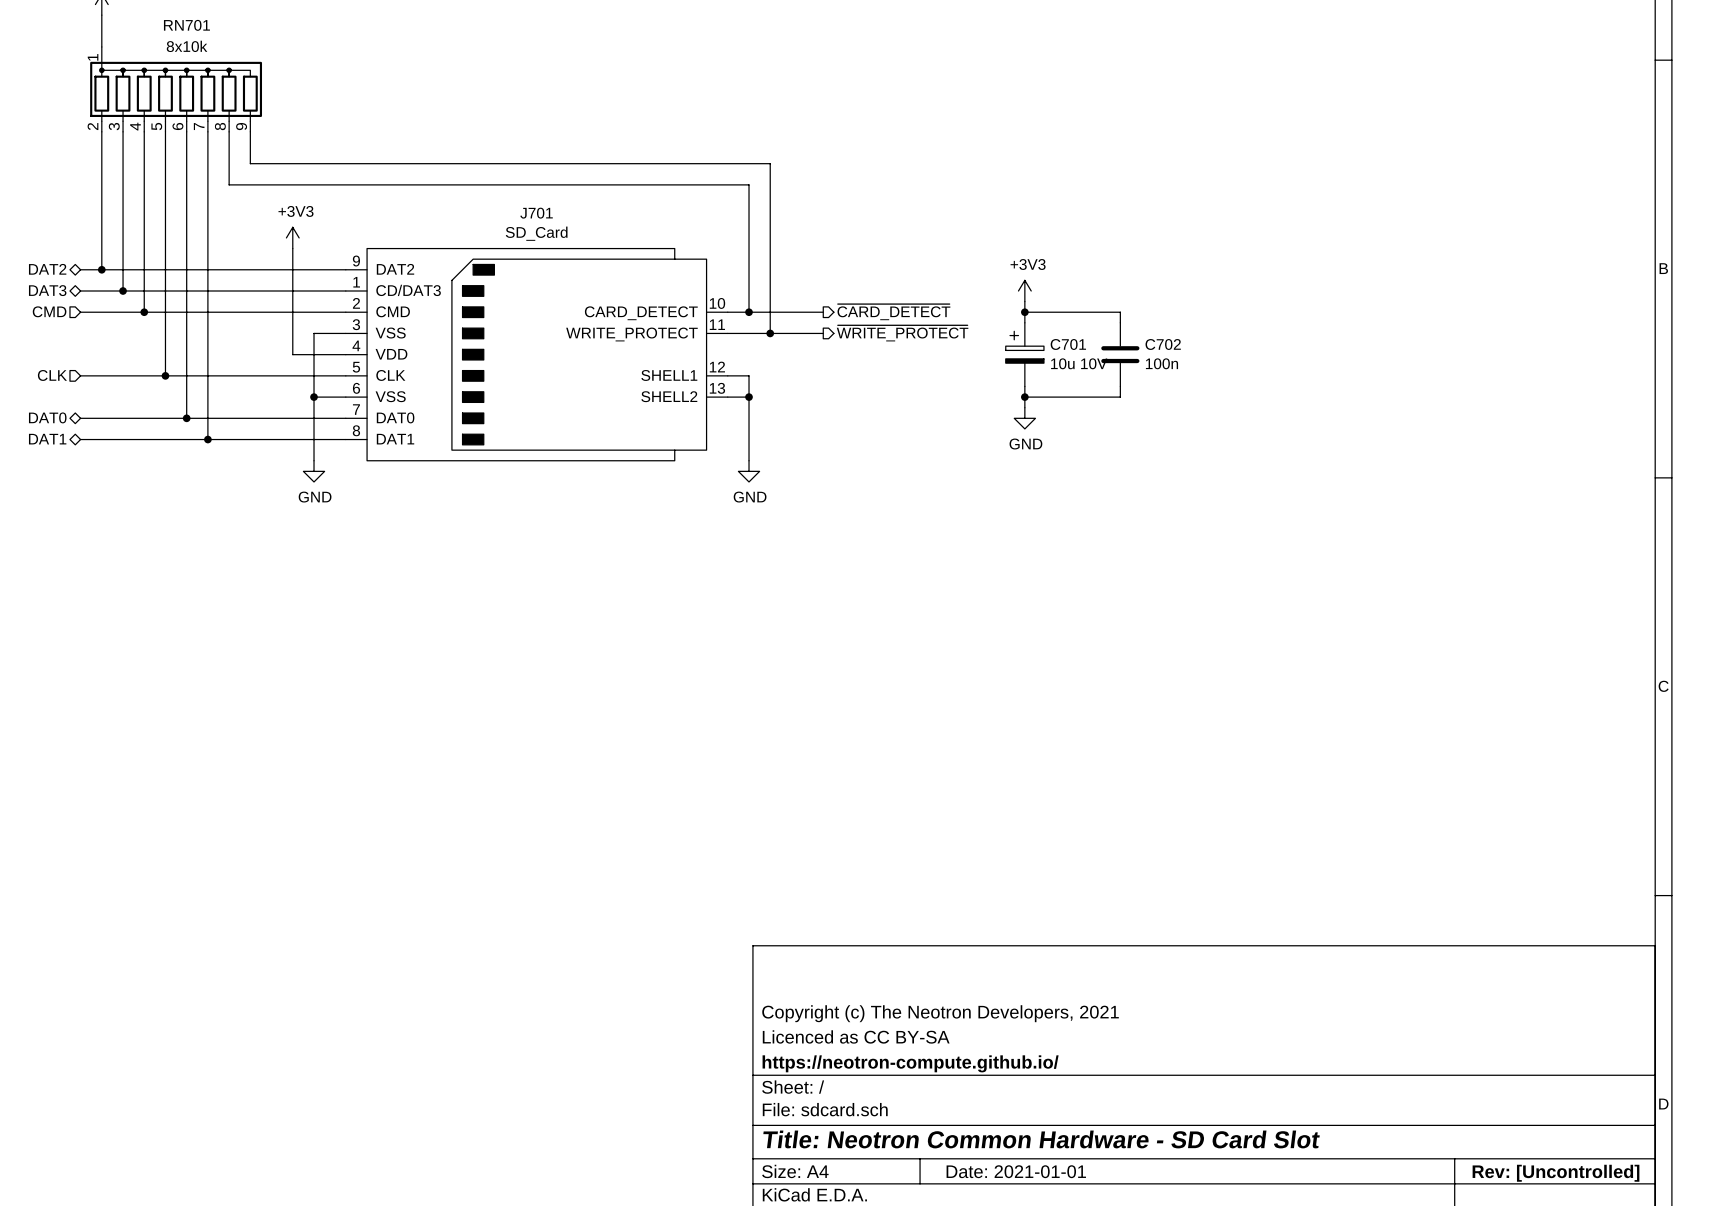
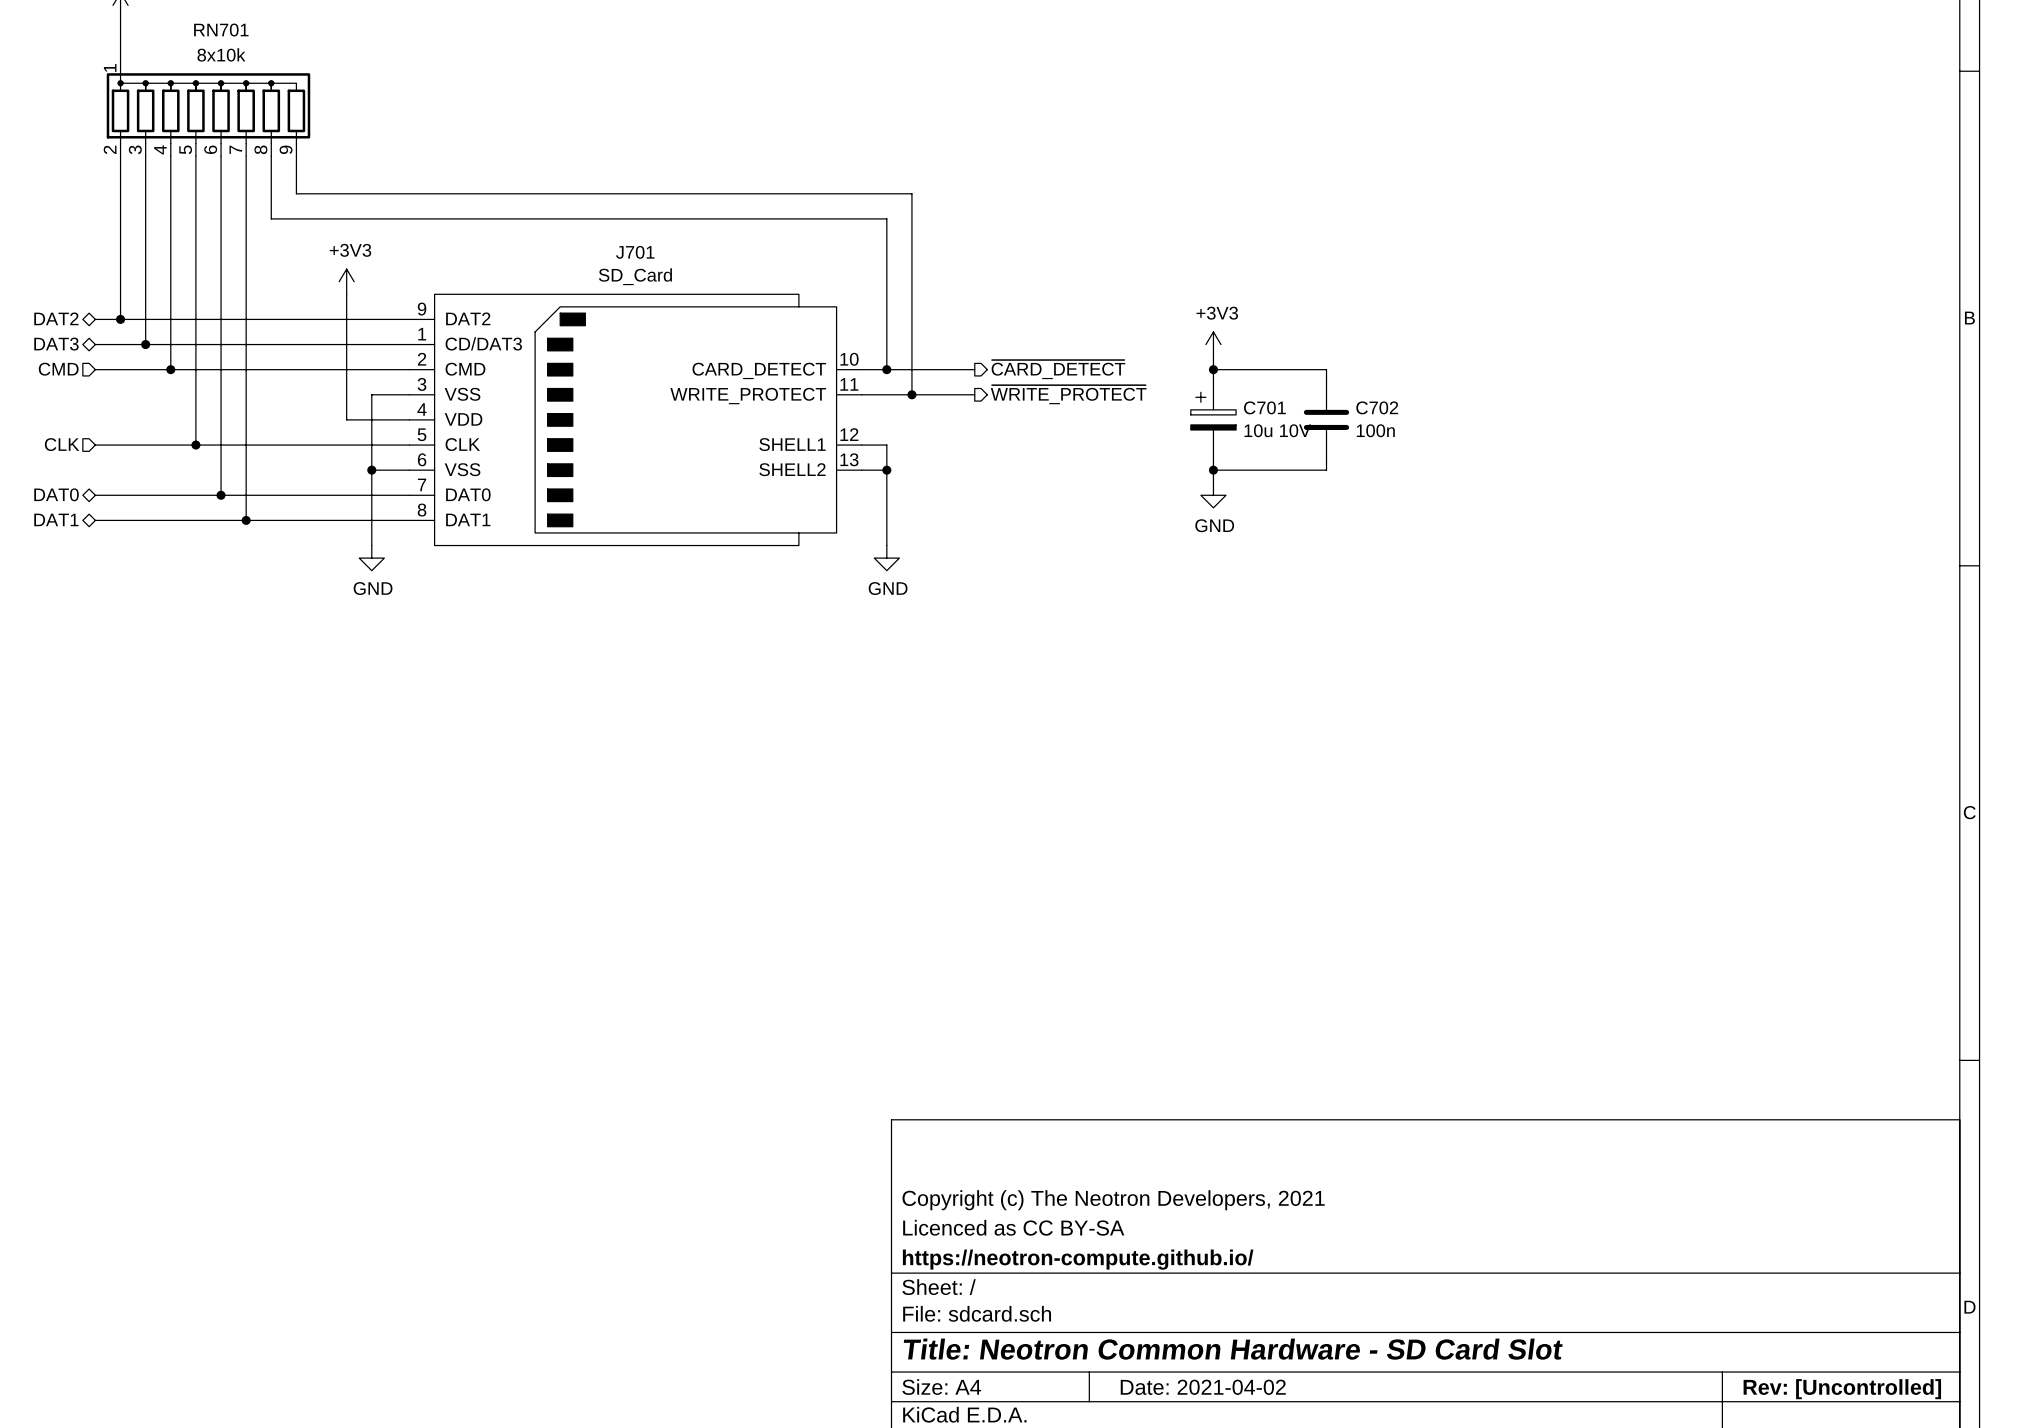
title block: Date: 2021-01-01 (1016, 1171) -> Date: 2021-04-02 (1203, 1387)

